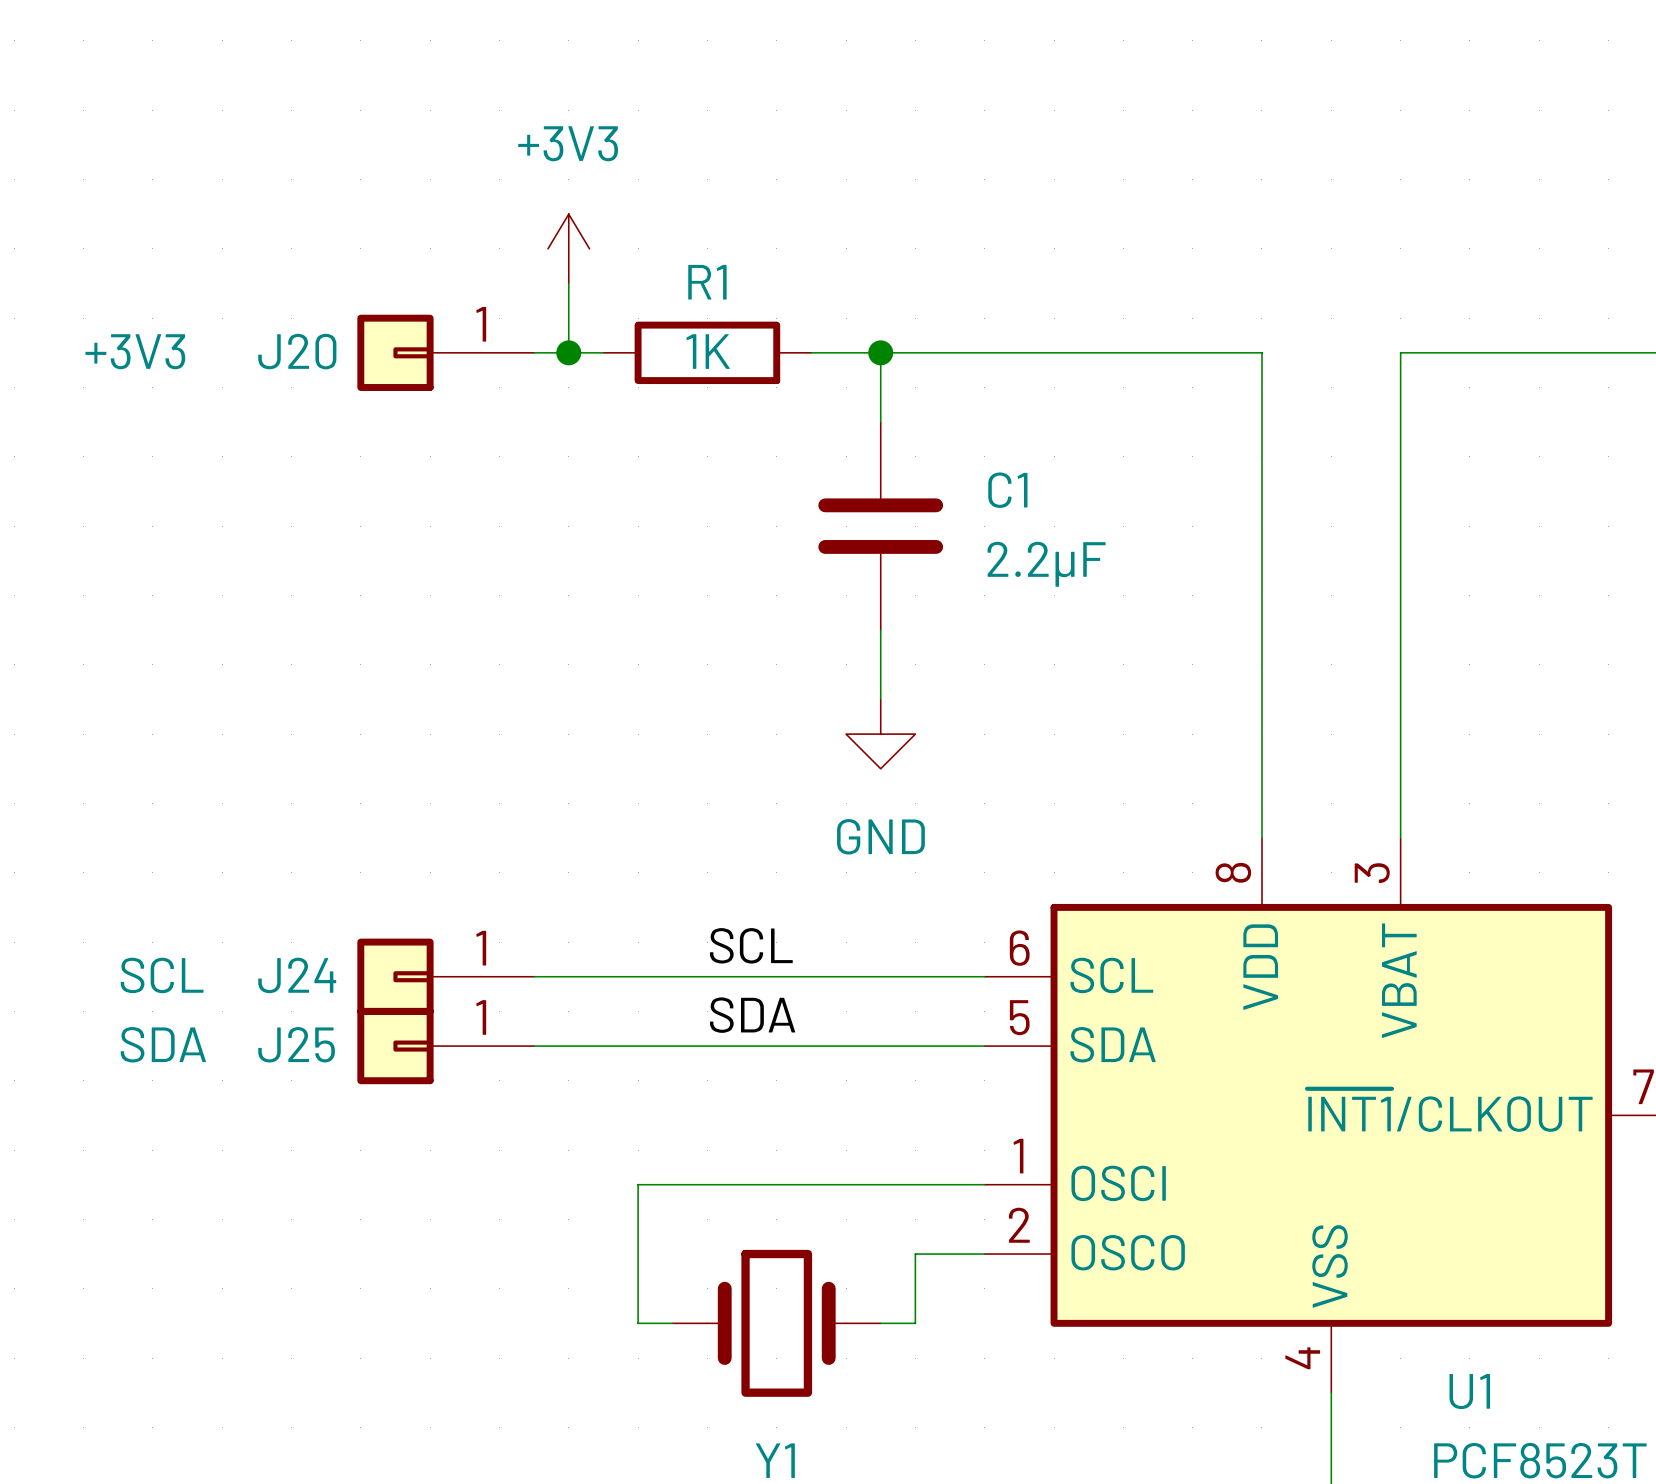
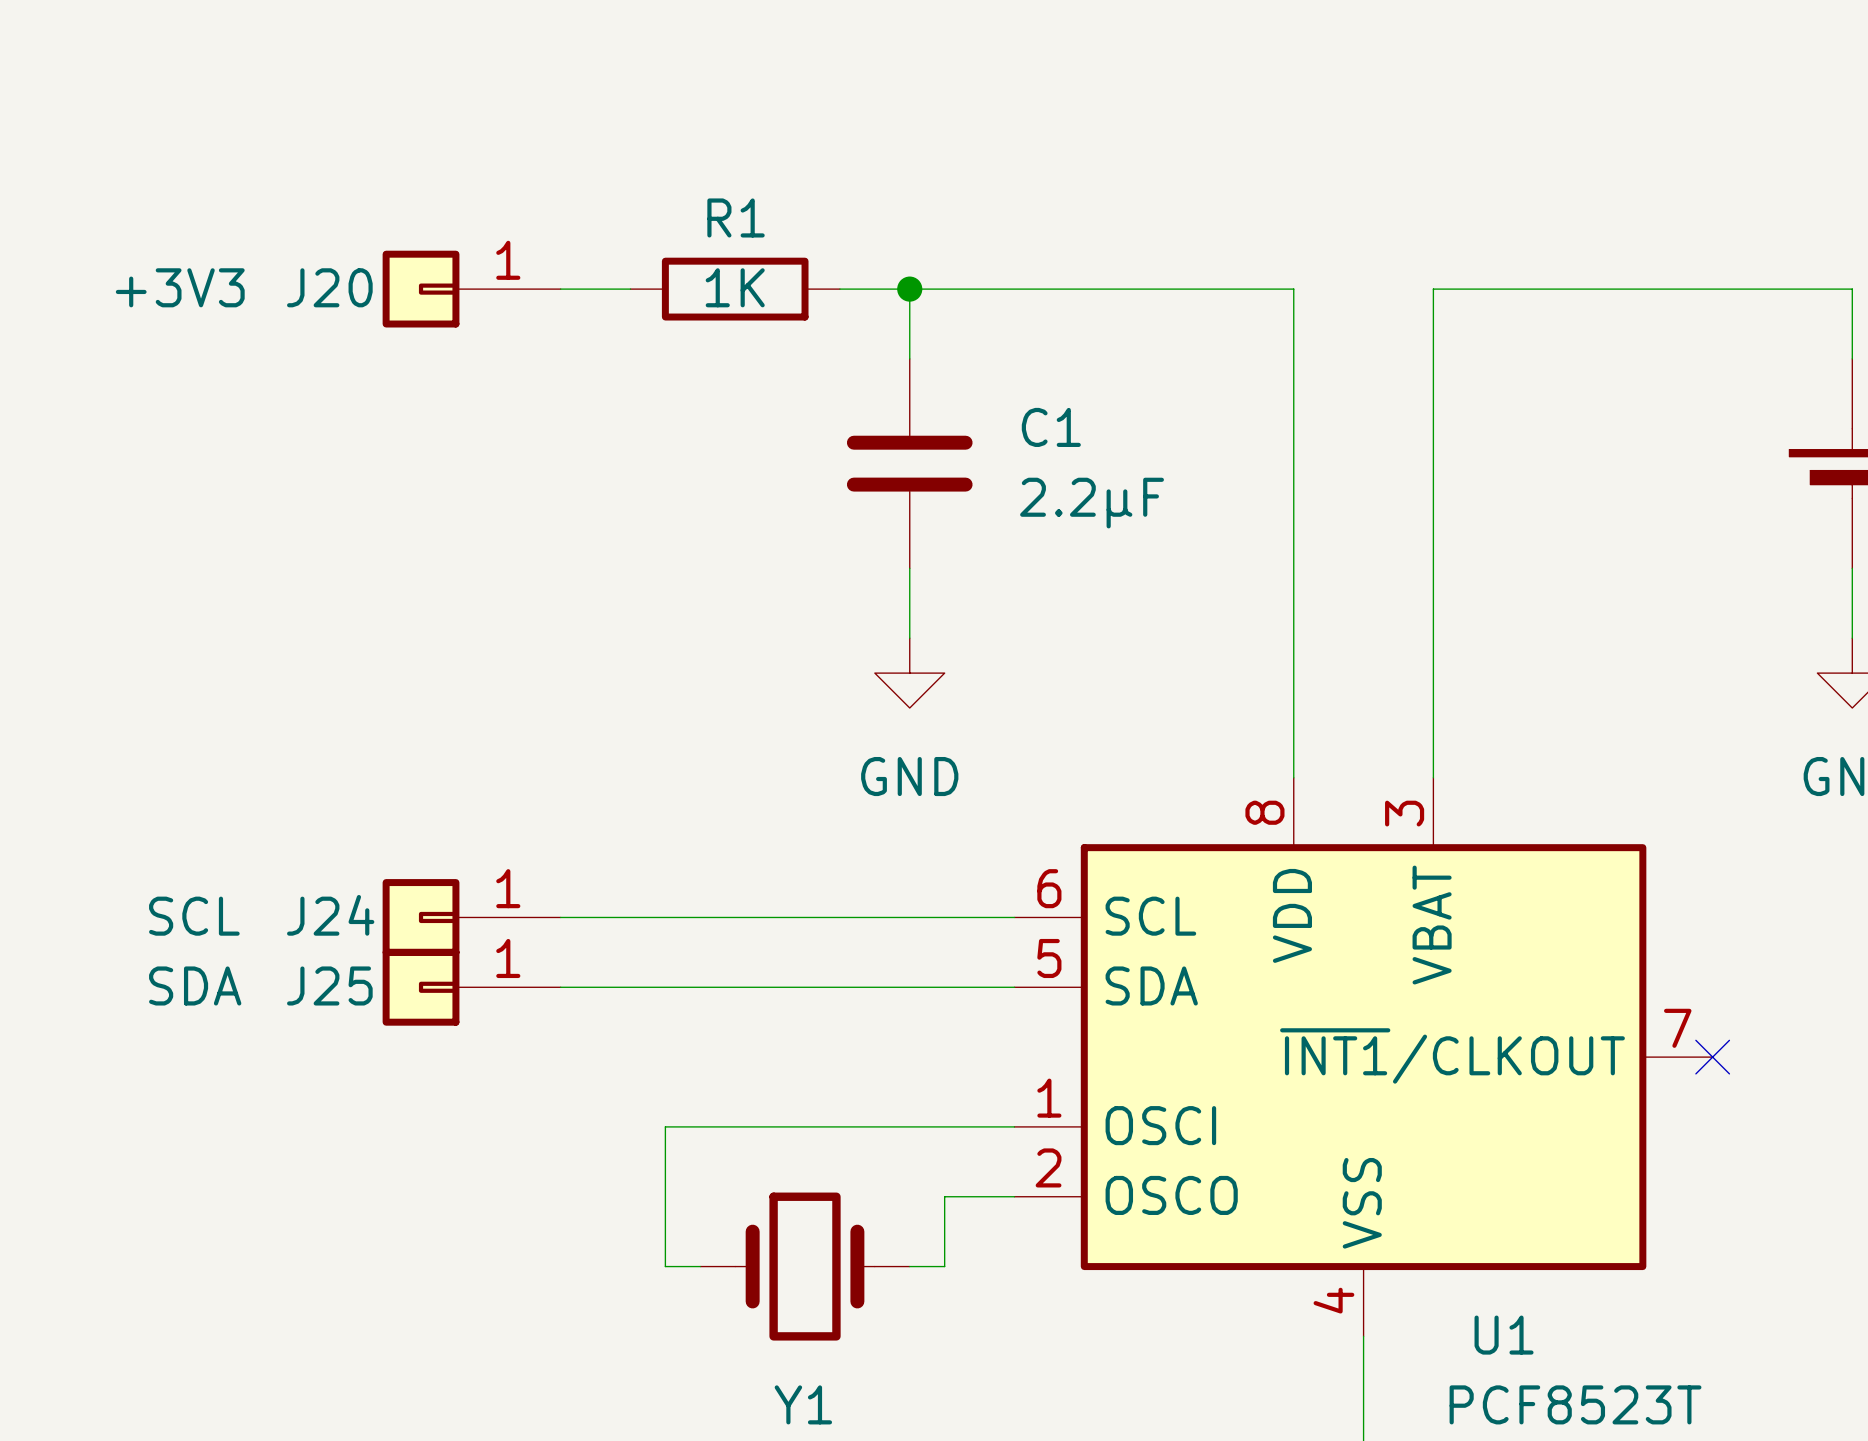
power symbol: +3V3 (568, 248) -> none
wire: (568, 283) (568, 352) -> none
junction: (568, 352) -> none
label: SCL (751, 945) -> none
label: SDA (752, 1015) -> none

